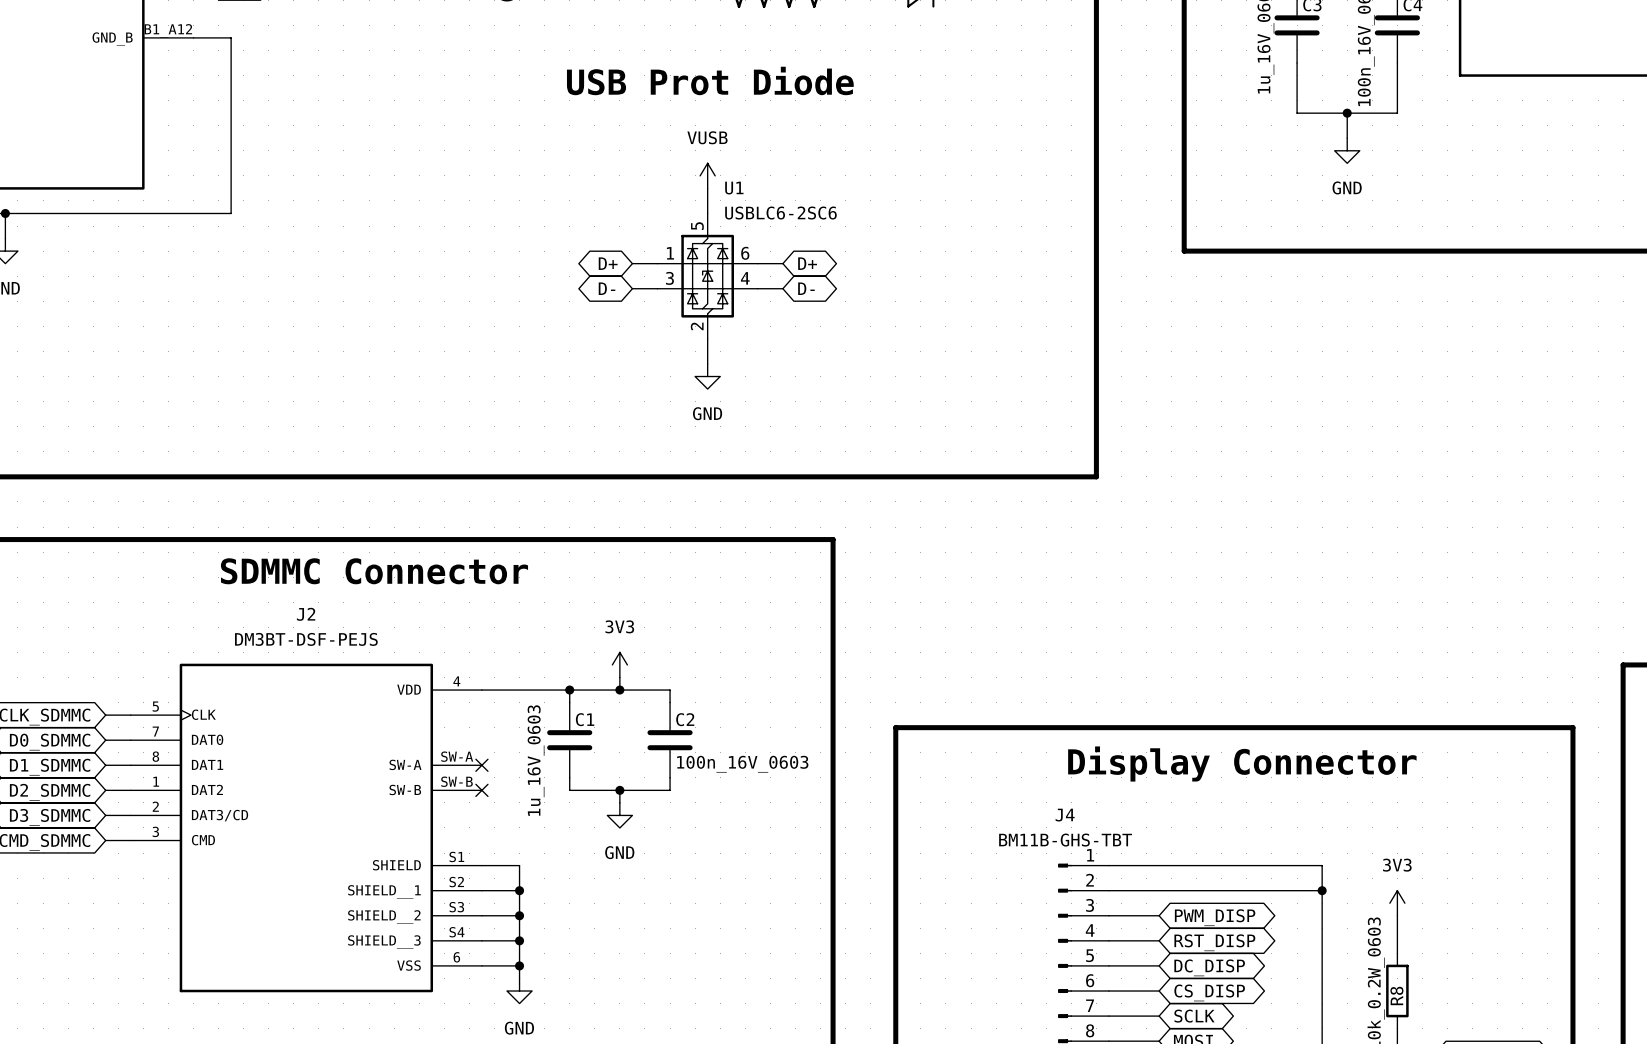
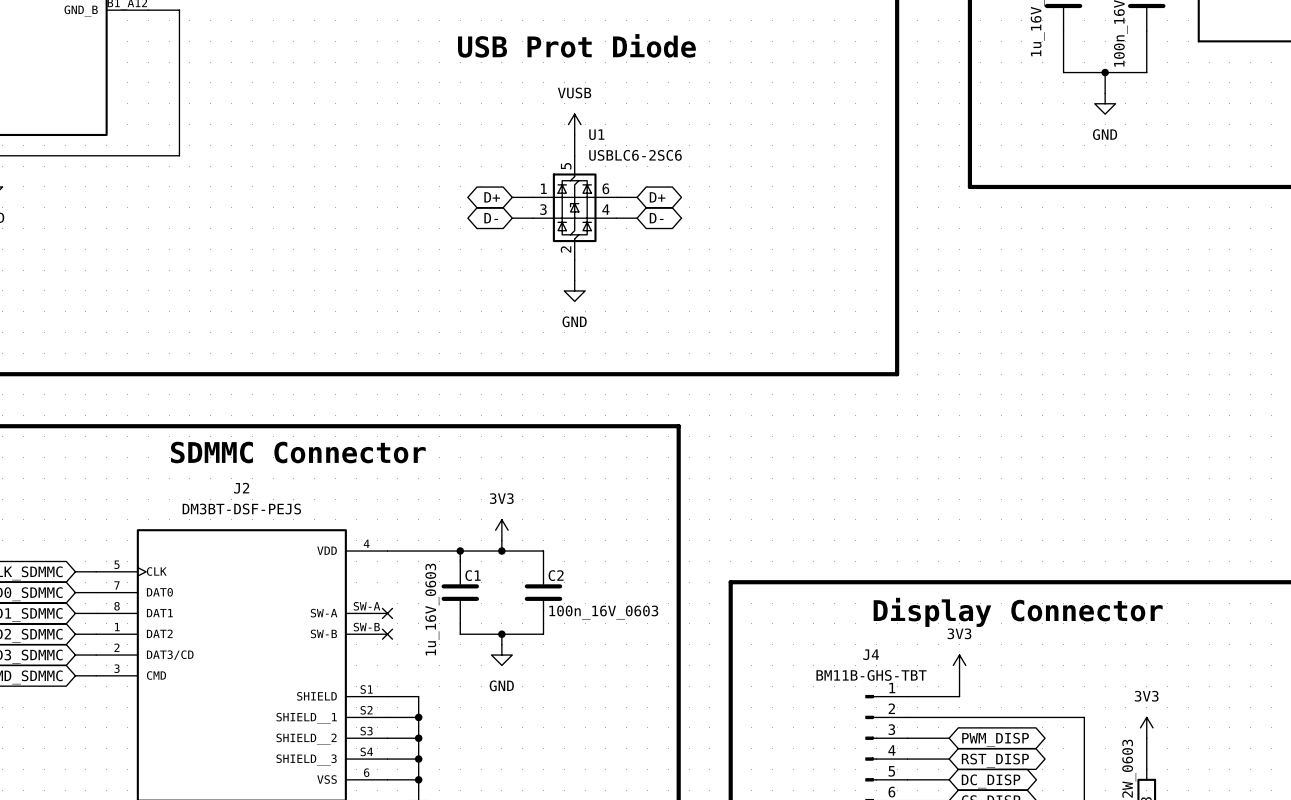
power symbol: none -> 3V3 (959, 665)
wire: (1171, 865) (1322, 865) (1322, 890) -> (959, 696) (959, 675)
junction: (1322, 890) -> none

